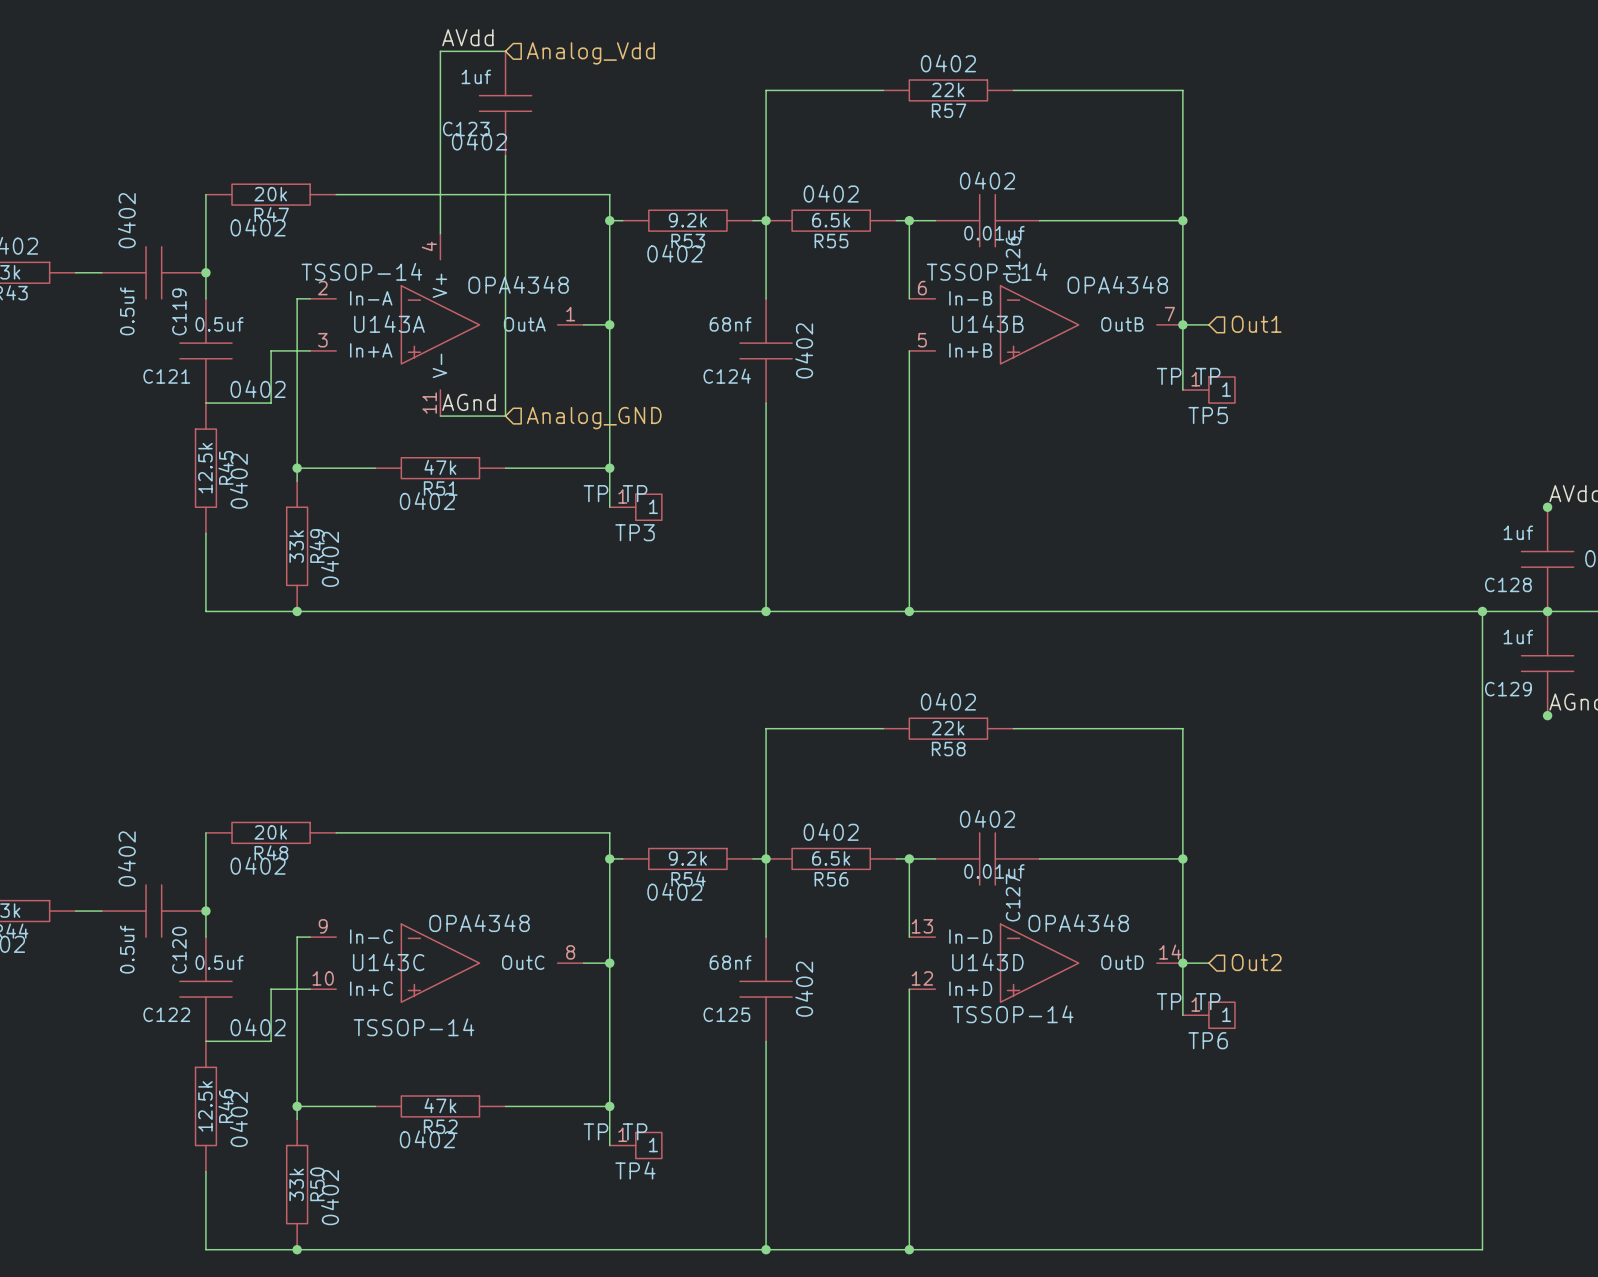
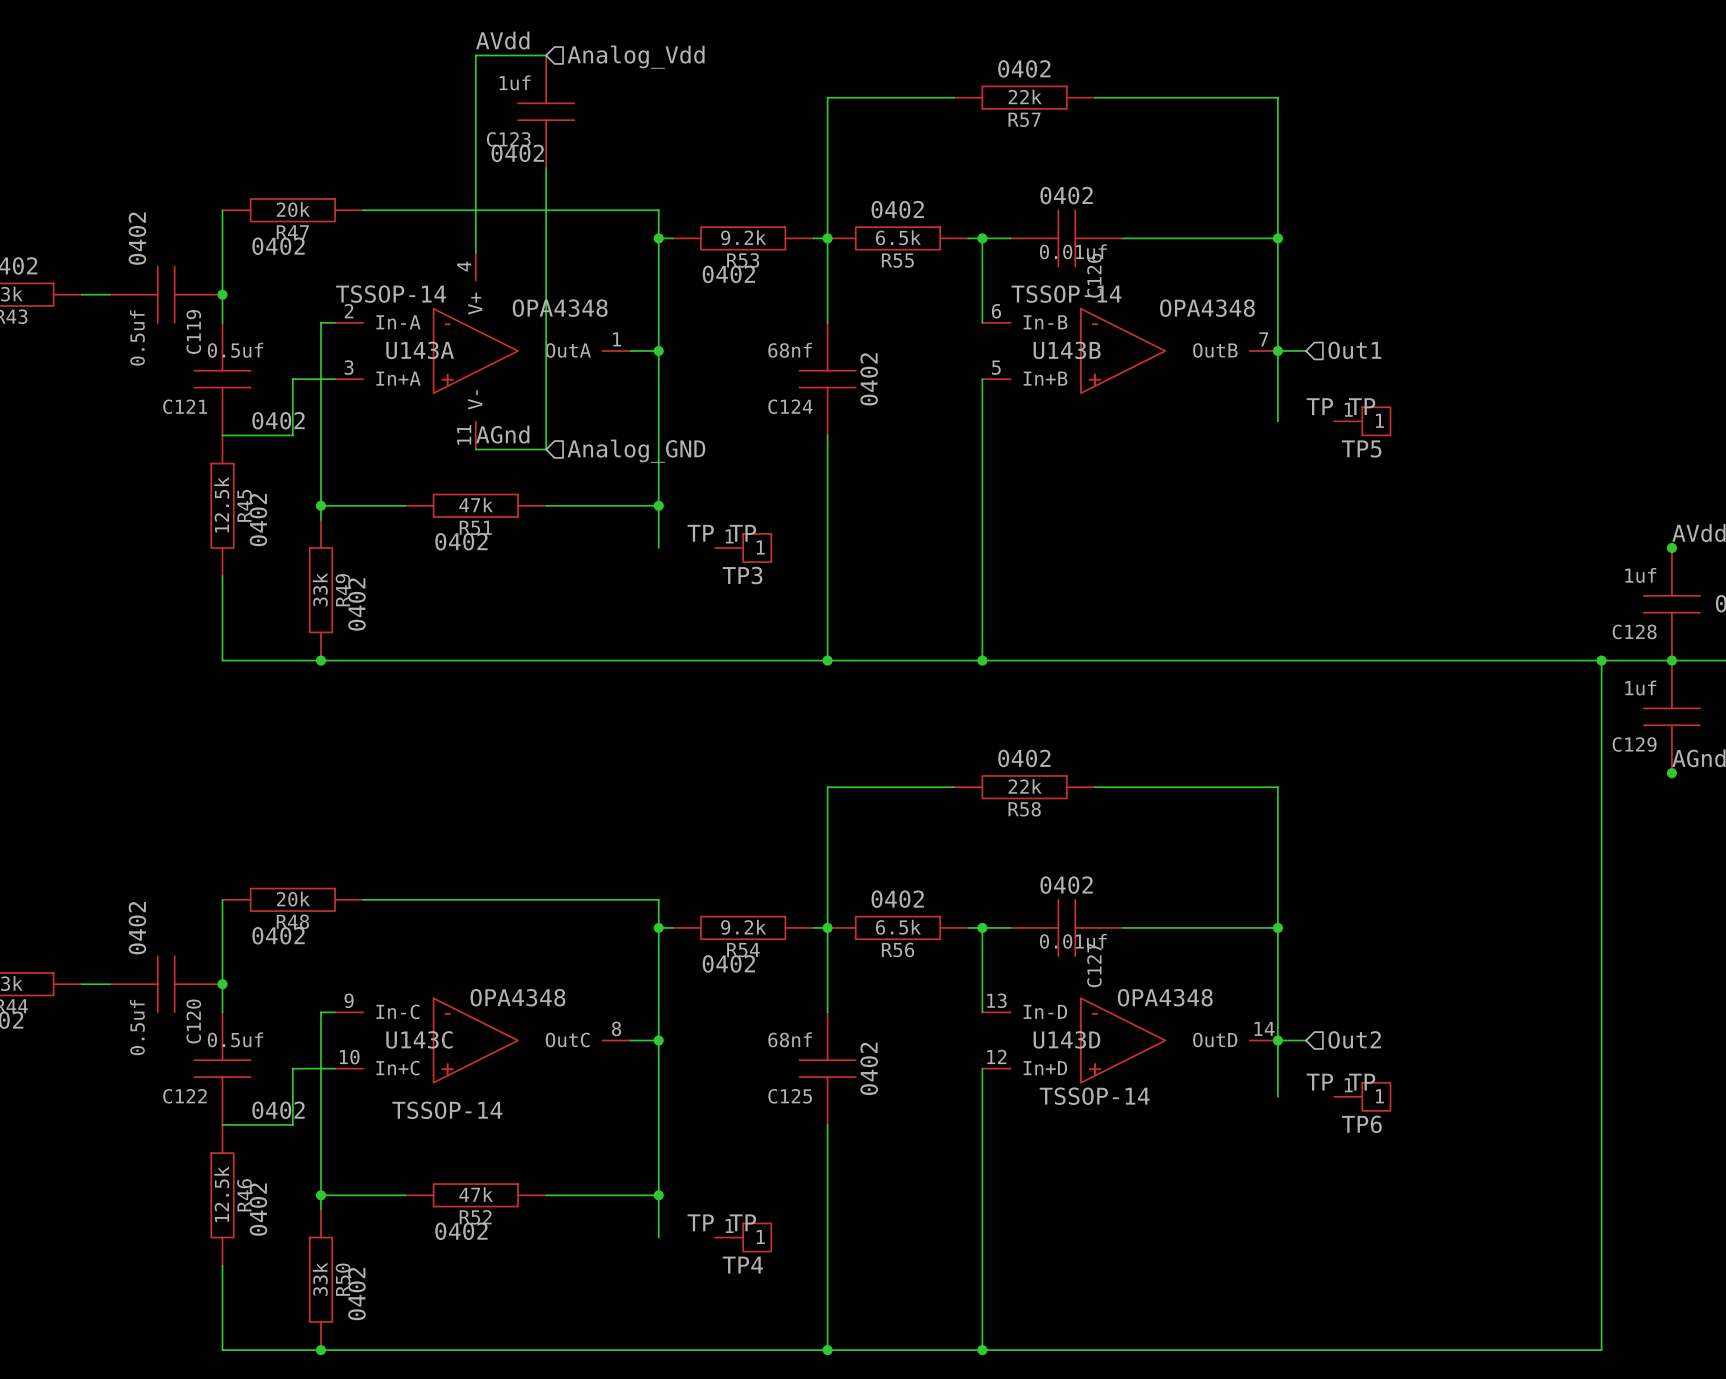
TP5 position: (1208, 390) -> (1362, 421)
TP3 position: (635, 507) -> (743, 548)
TP6 position: (1208, 1015) -> (1362, 1096)
TP4 position: (635, 1145) -> (743, 1237)

